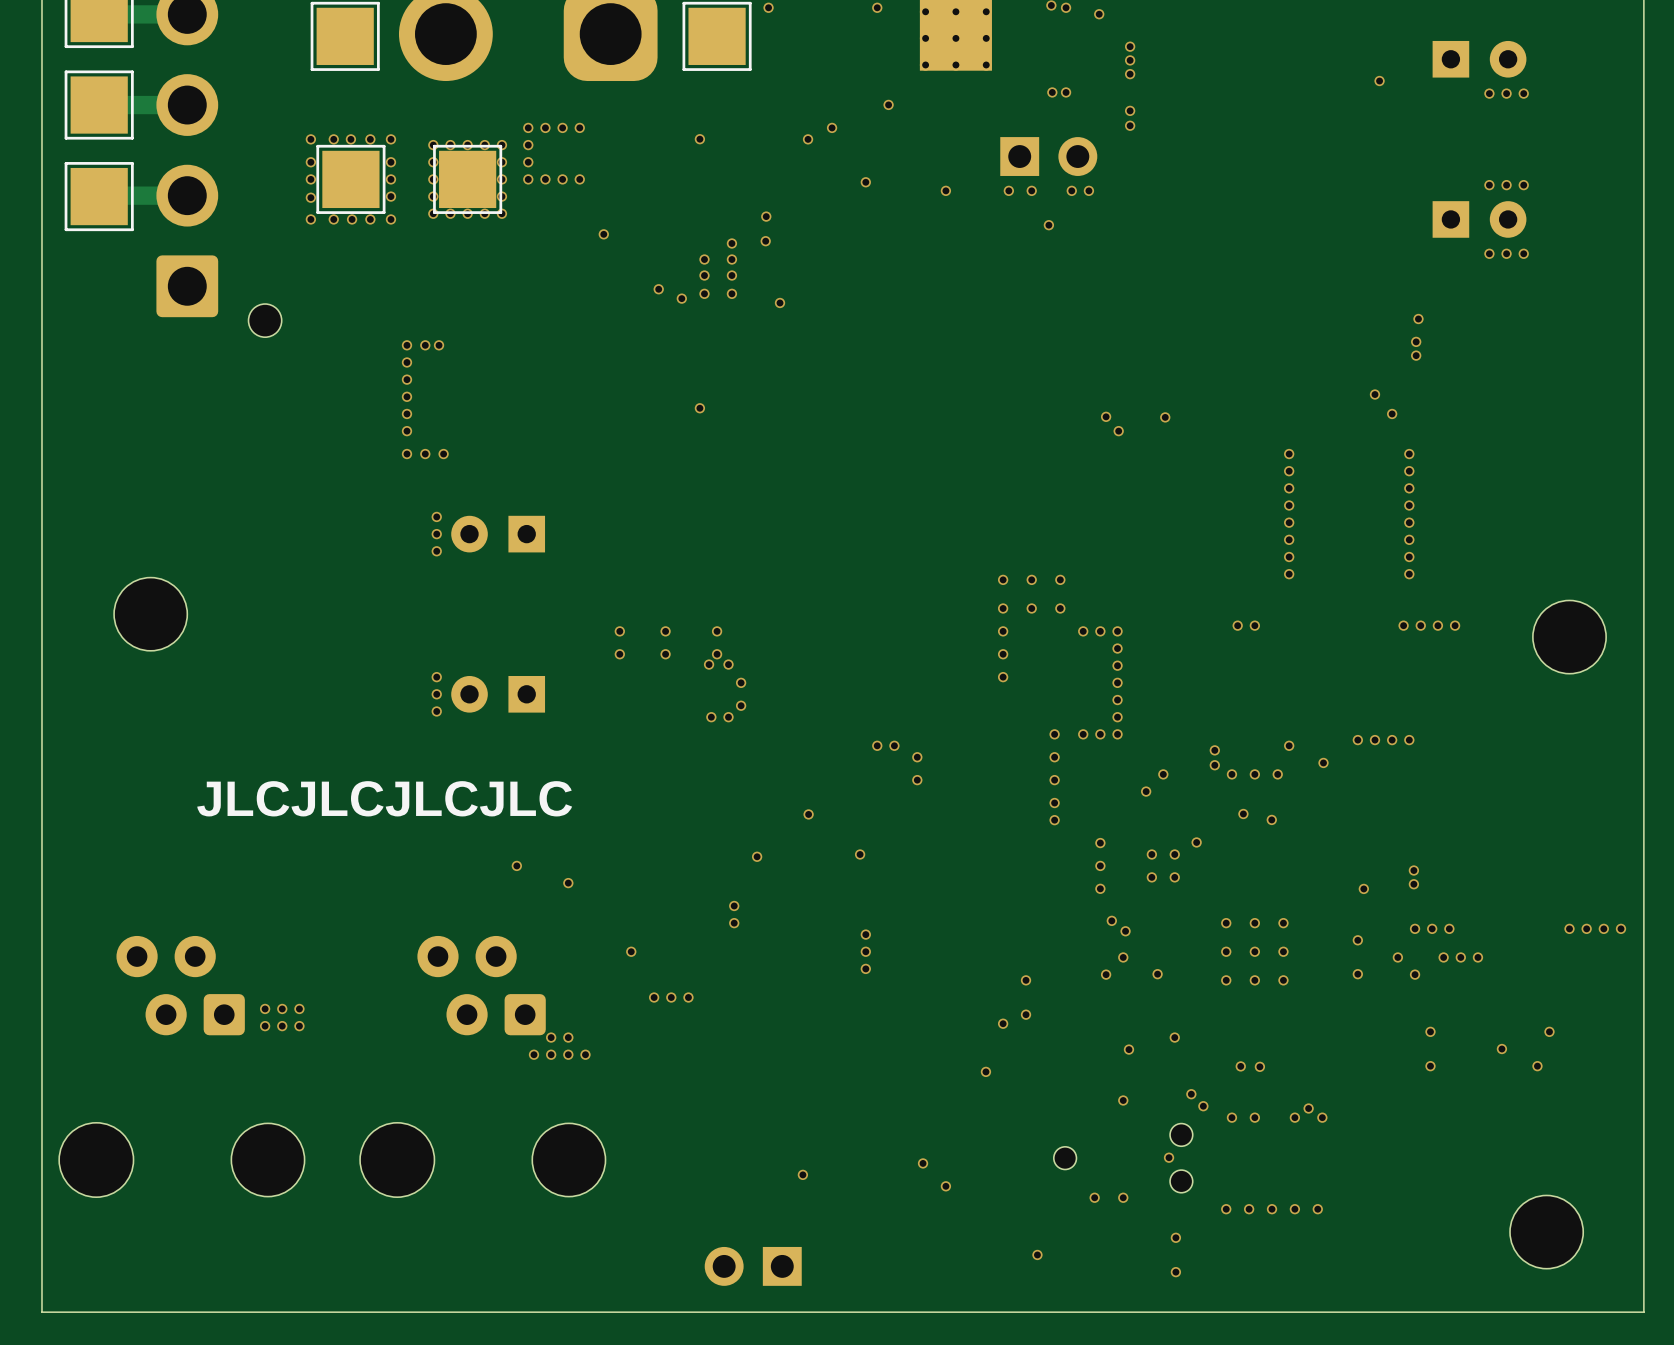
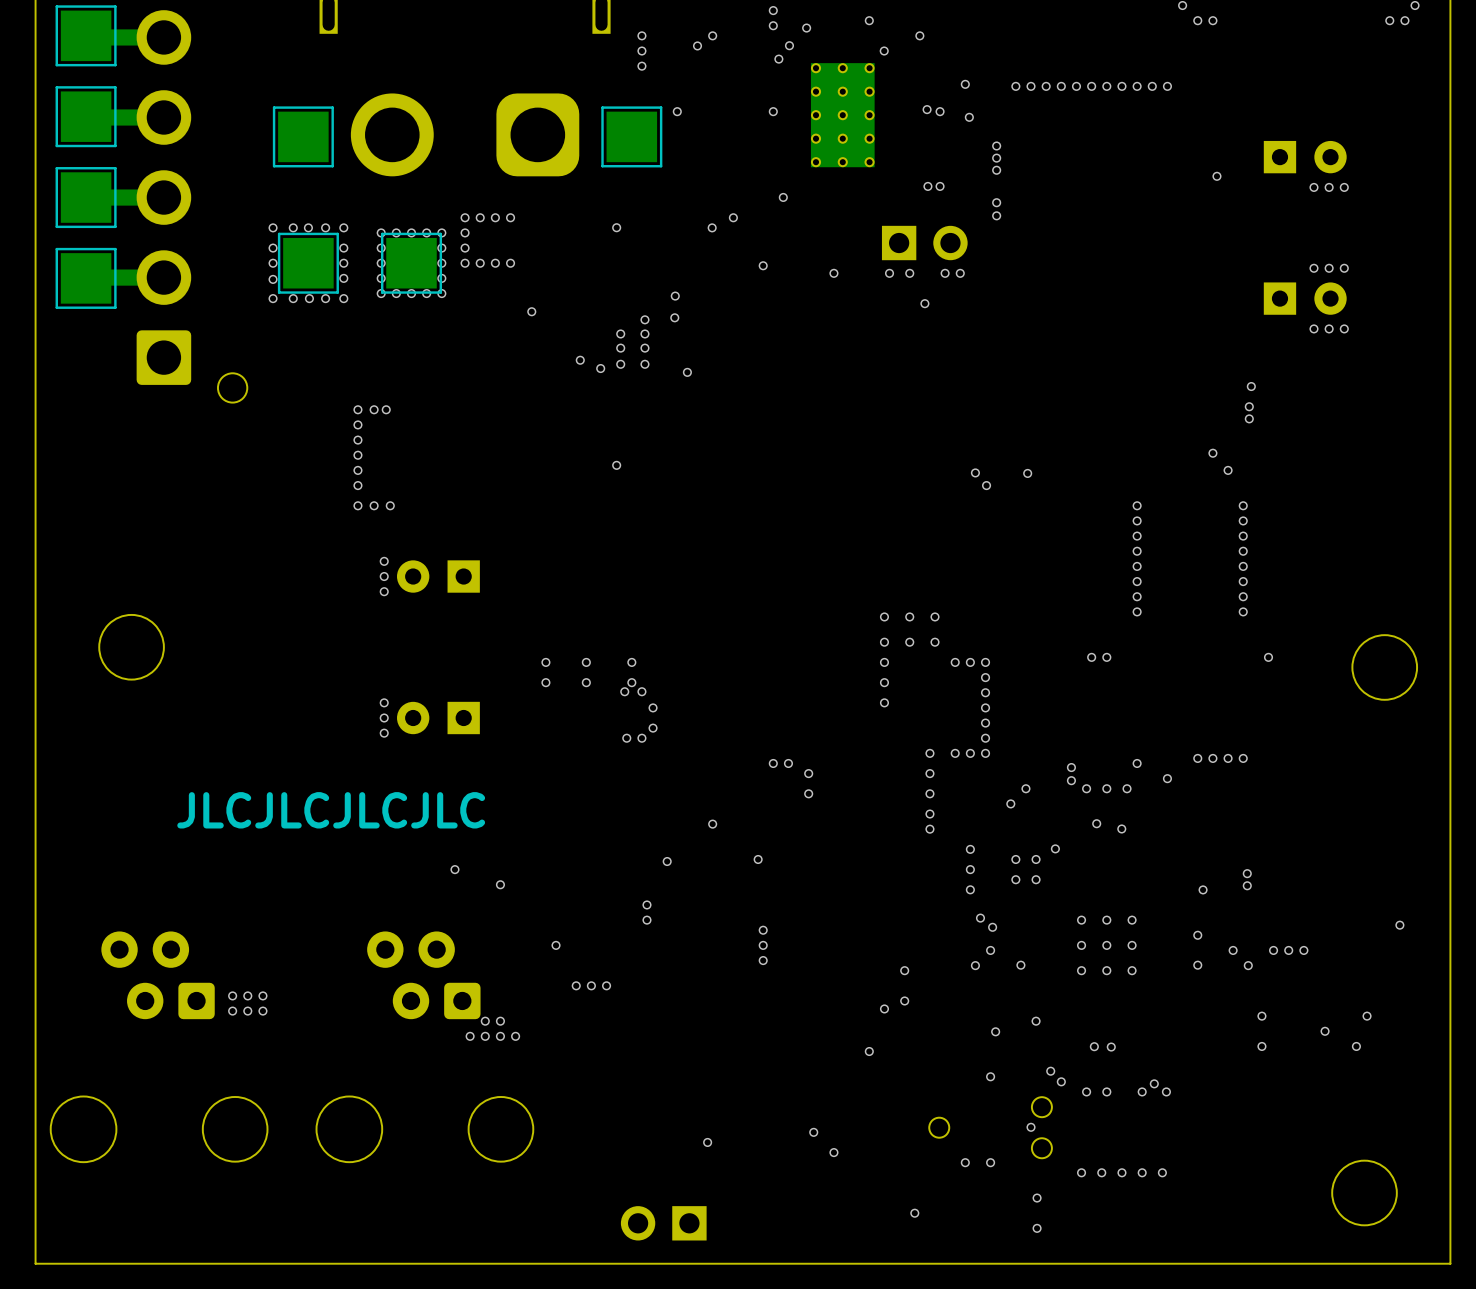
via: (1403, 625) -> none
via: (1420, 625) -> none
via: (1455, 625) -> none
via: (1415, 928) -> none
via: (1432, 928) -> none
via: (1449, 928) -> none
via: (1569, 928) -> none
via: (1603, 928) -> none
via: (1620, 928) -> none

